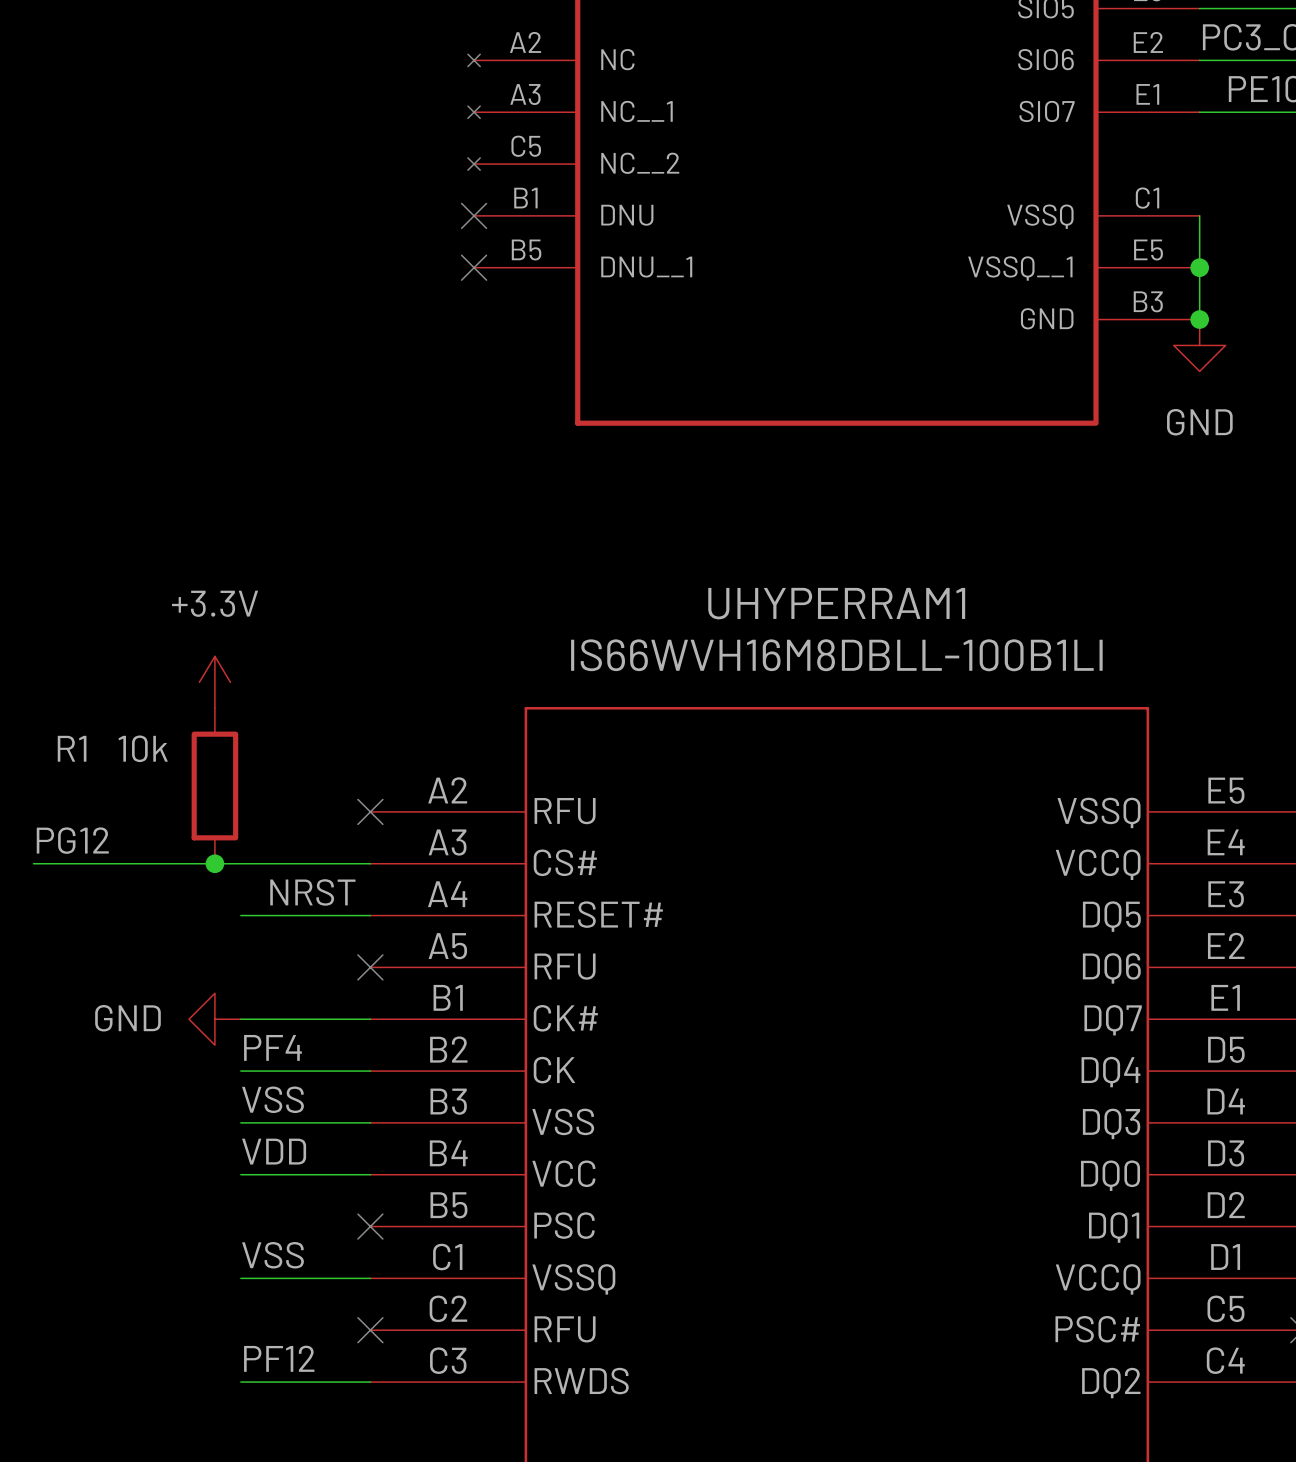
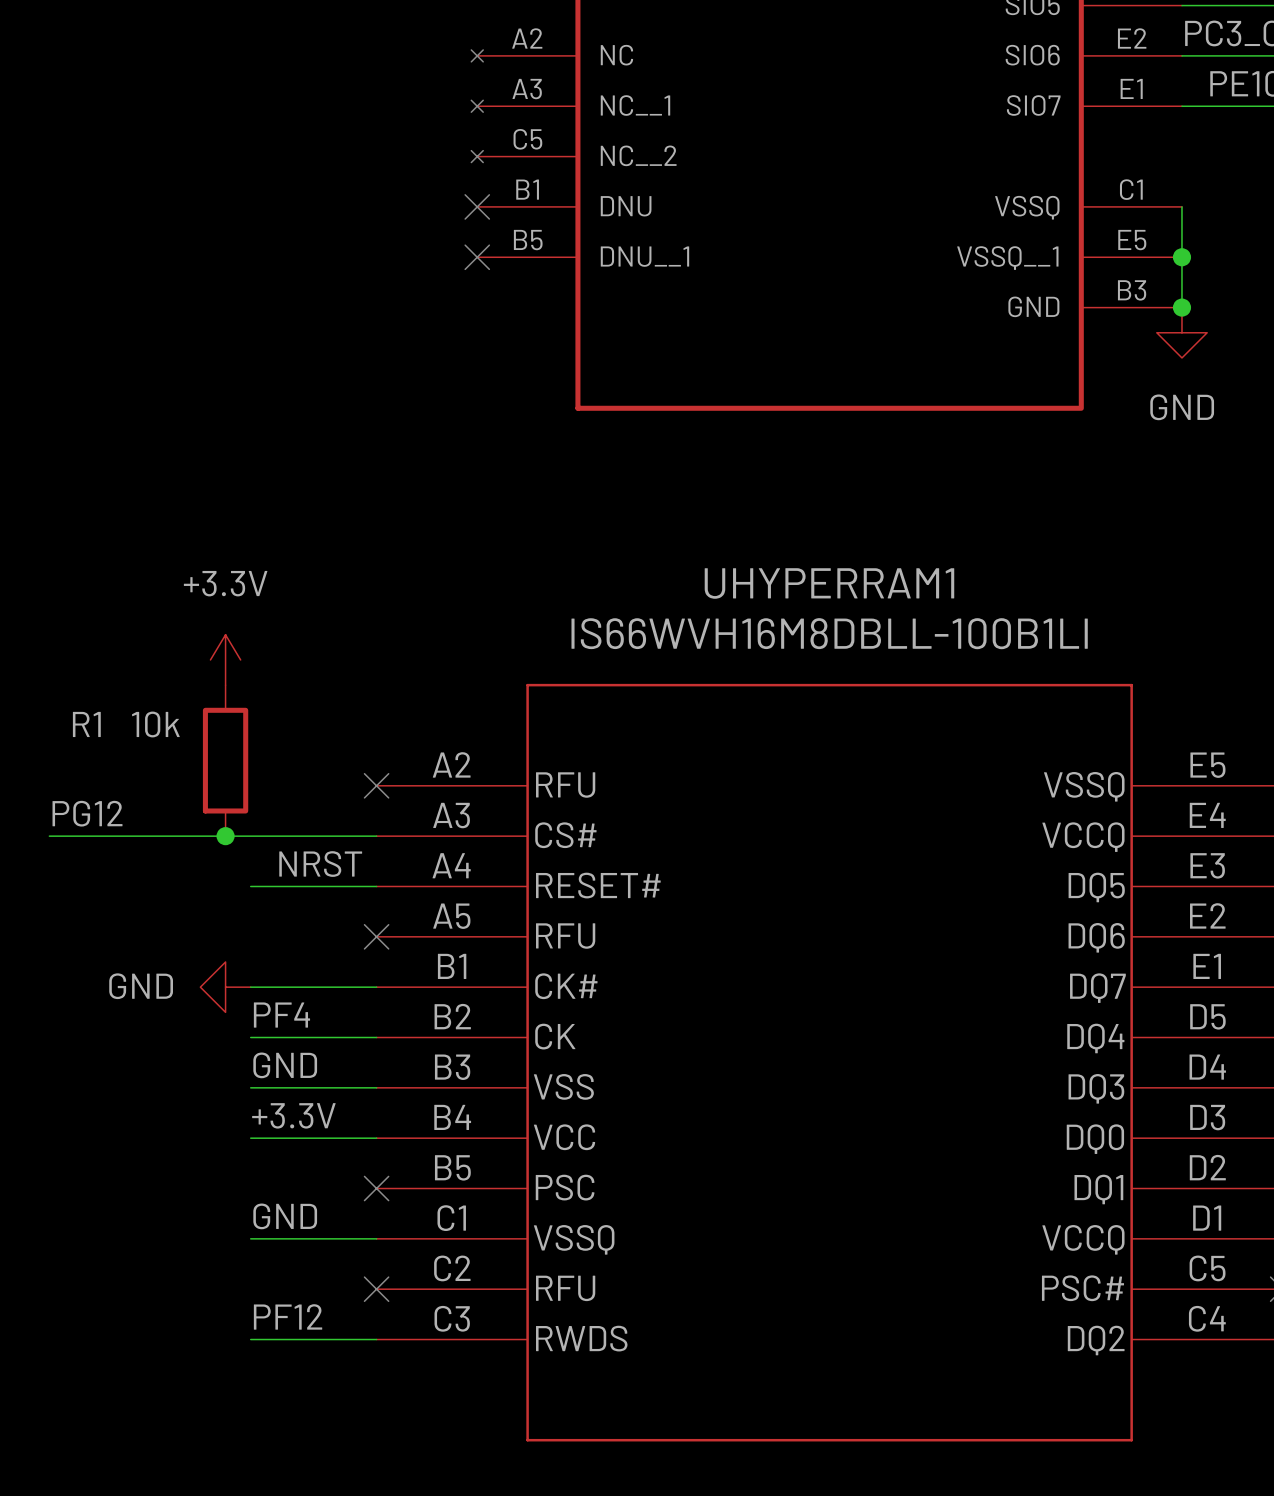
label: VSS (273, 1099) -> GND (285, 1065)
label: VDD (274, 1151) -> +3.3V (293, 1115)
label: VSS (273, 1255) -> GND (285, 1216)

